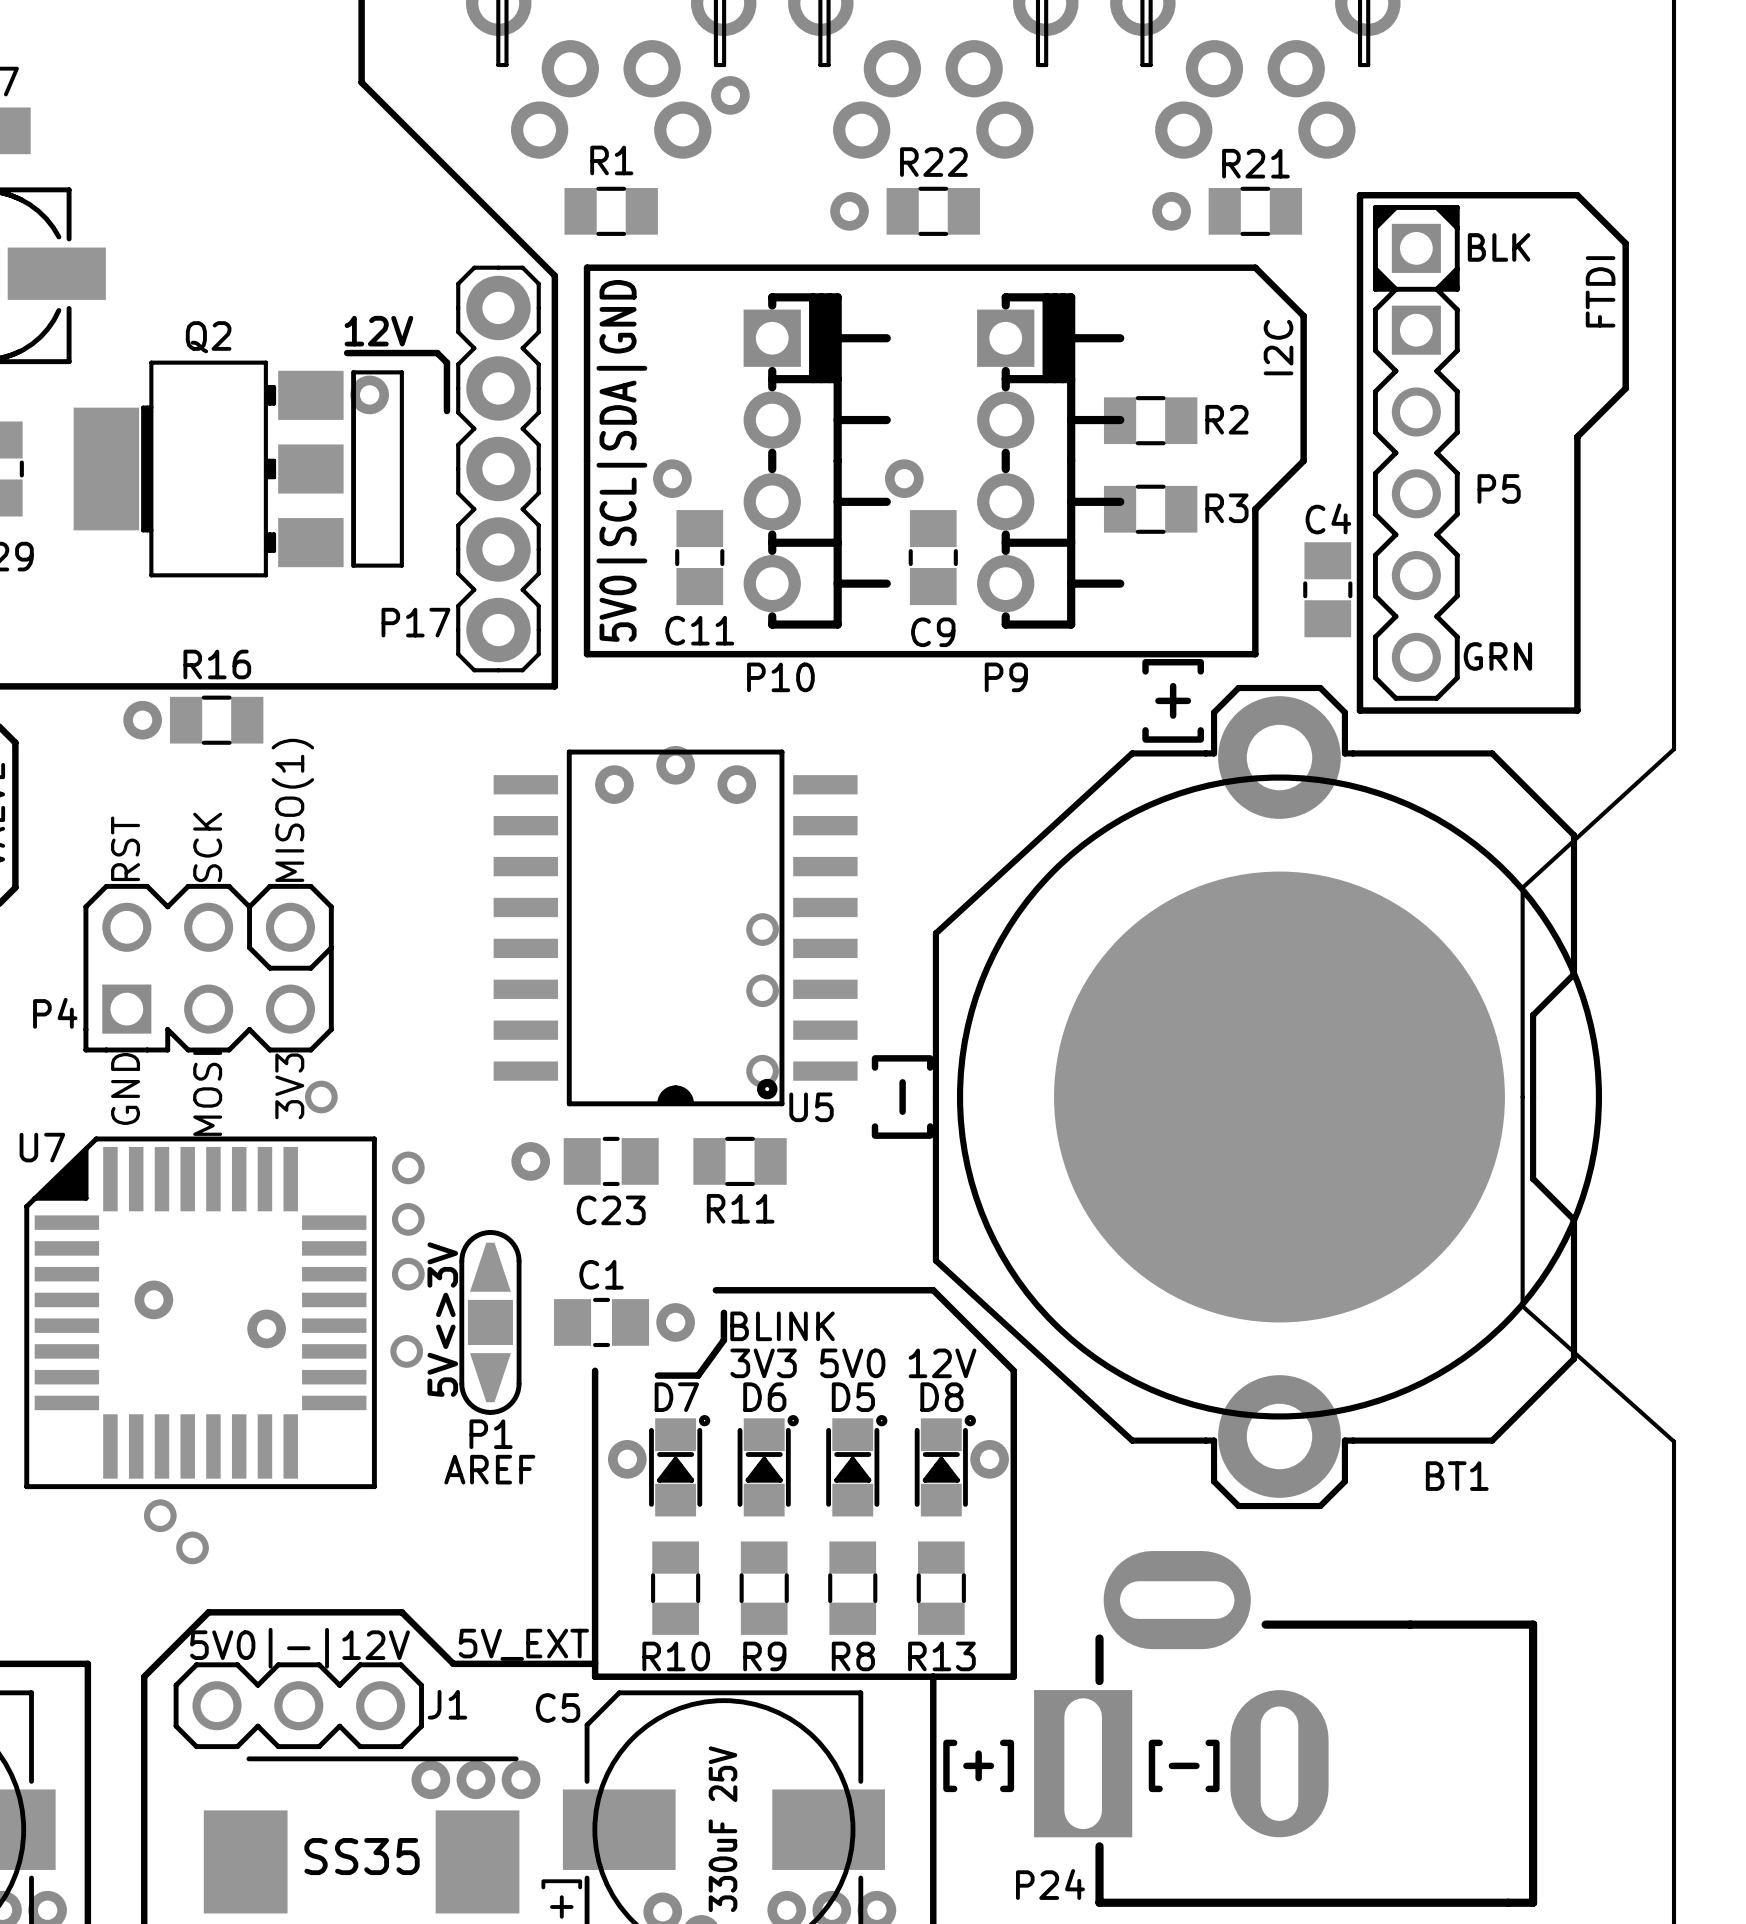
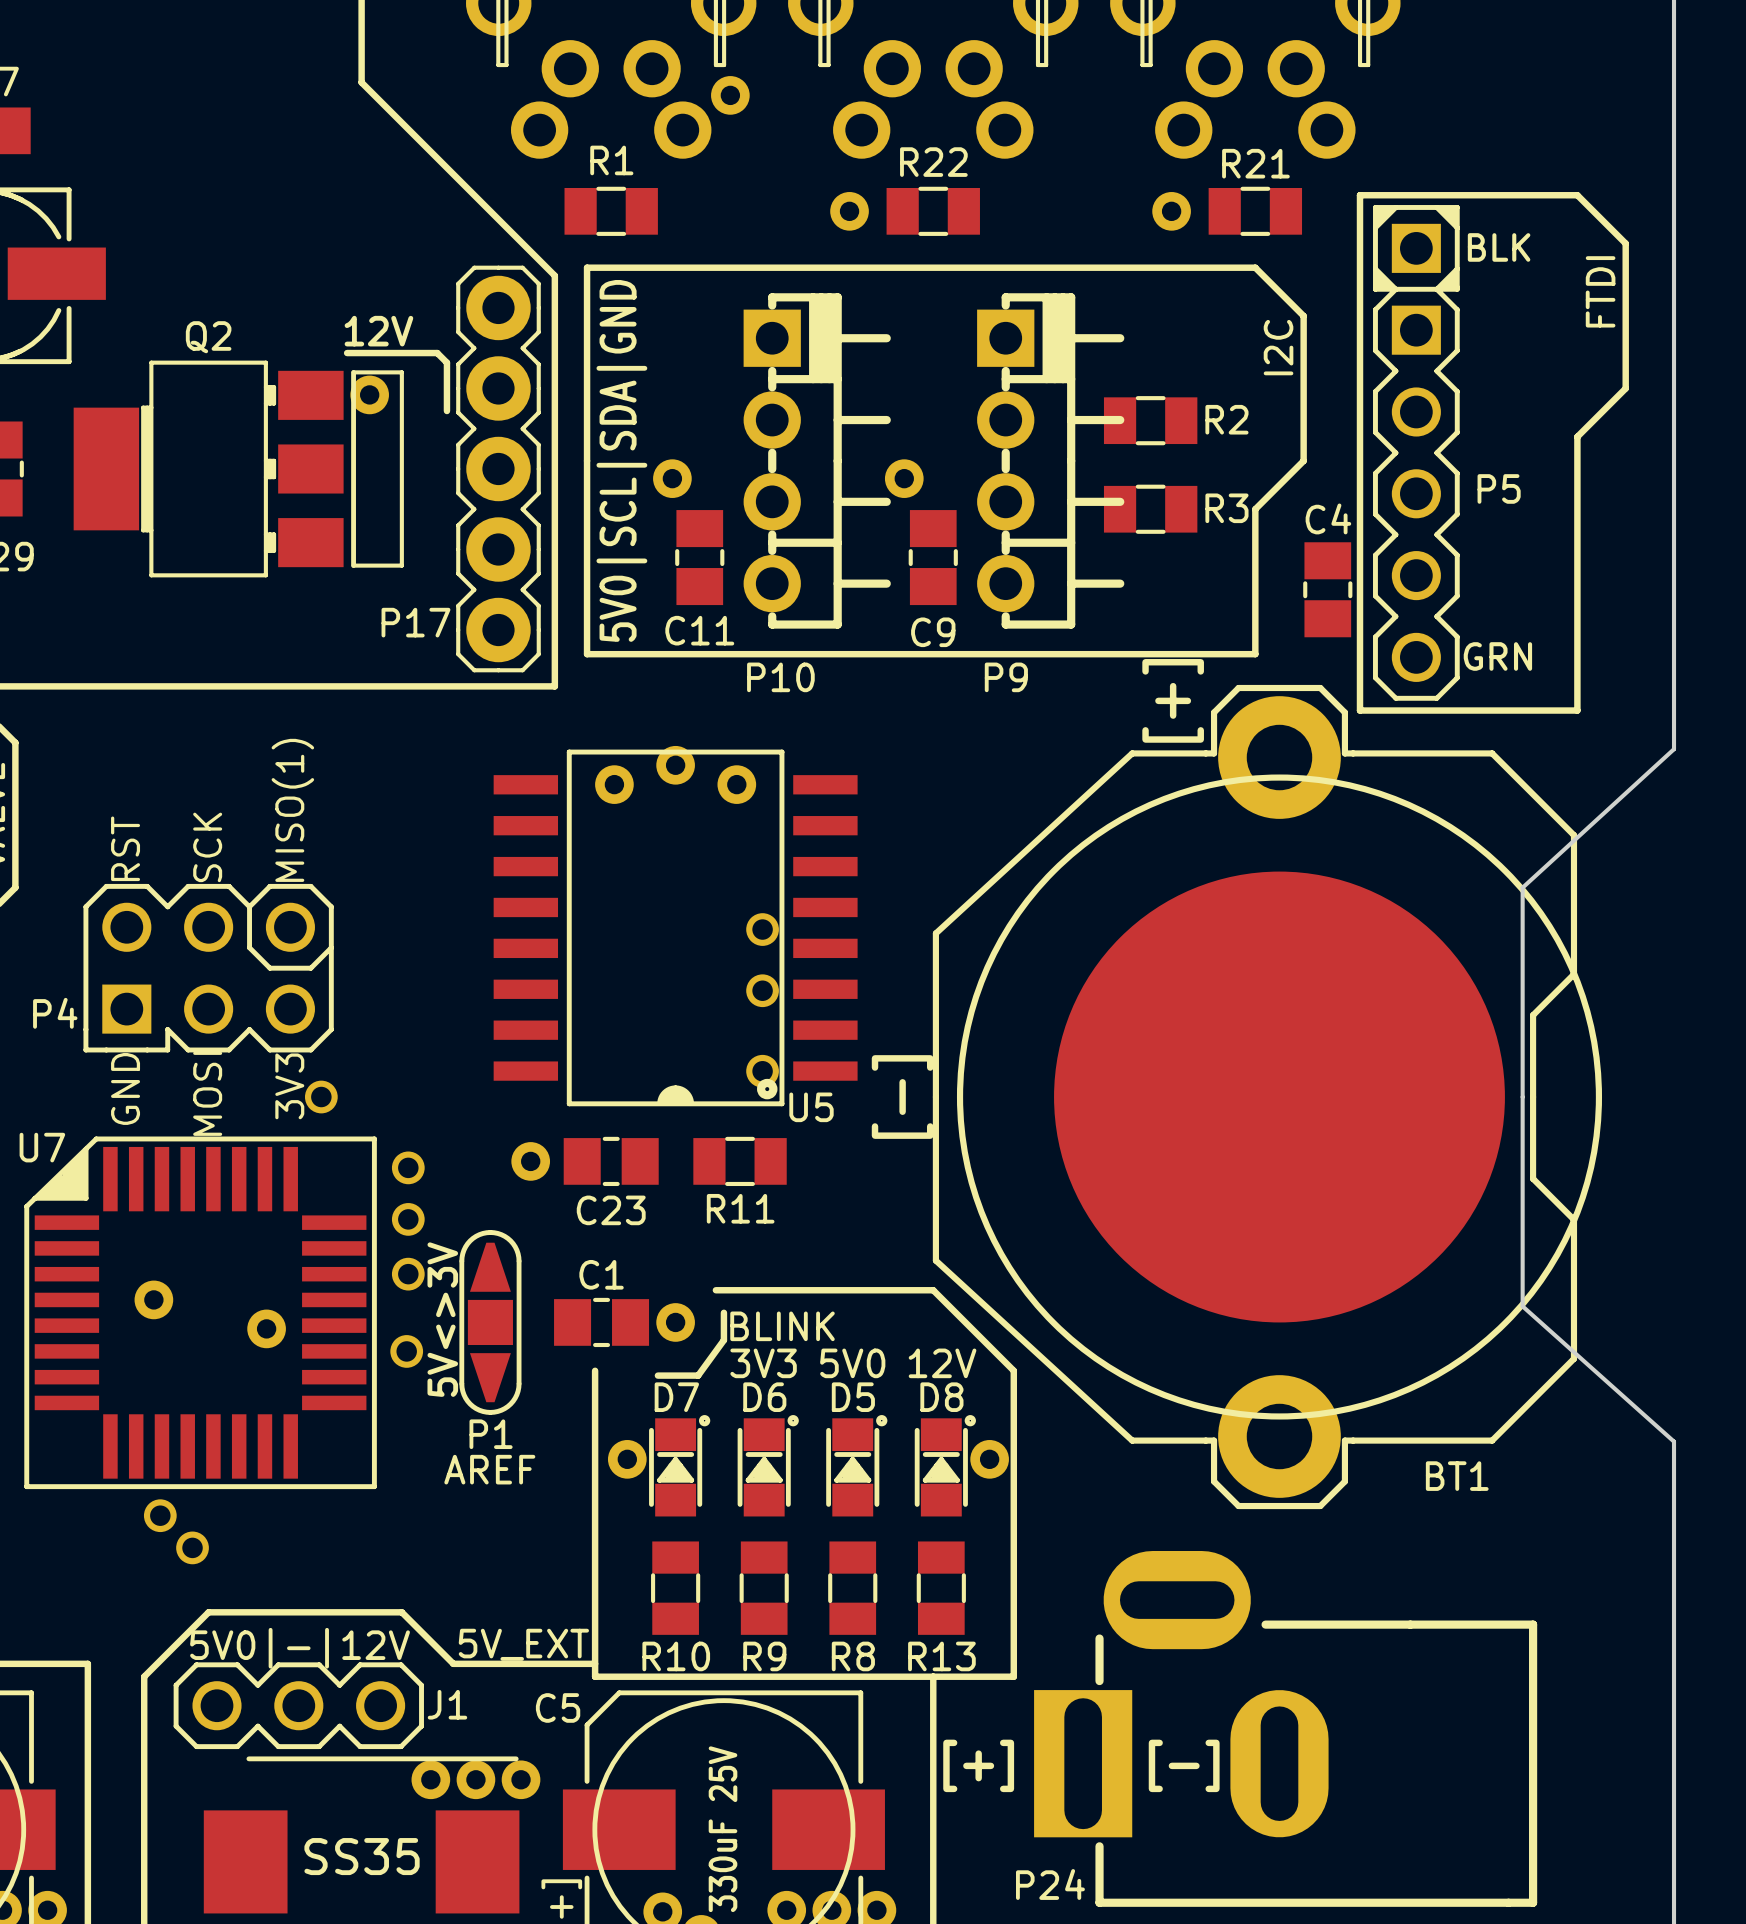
part: (142, 720) -> none
R16: (216, 720) -> none

